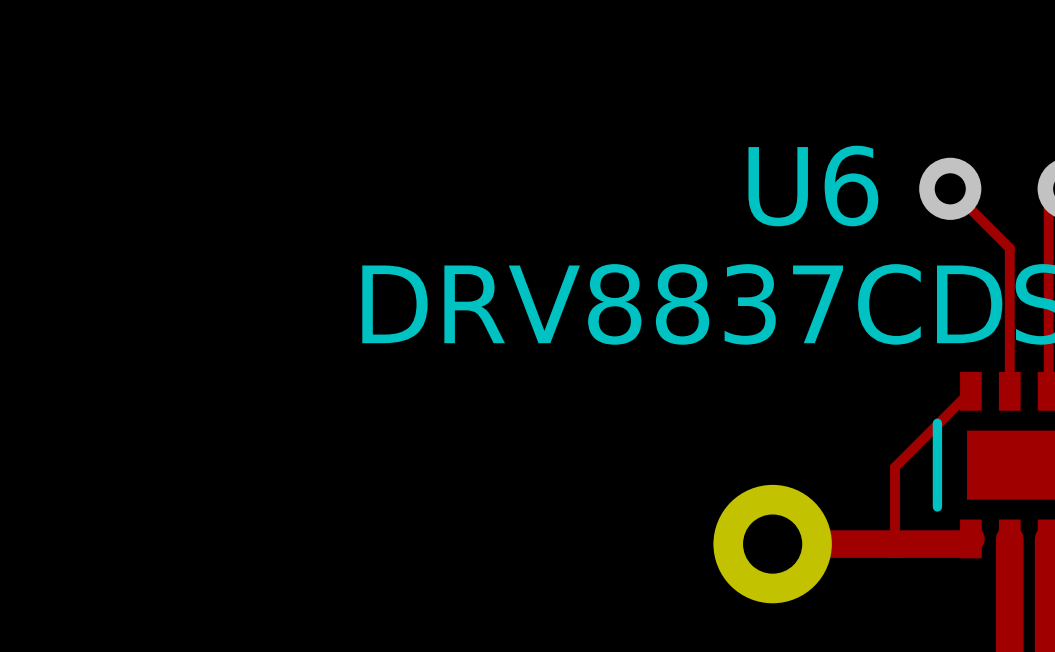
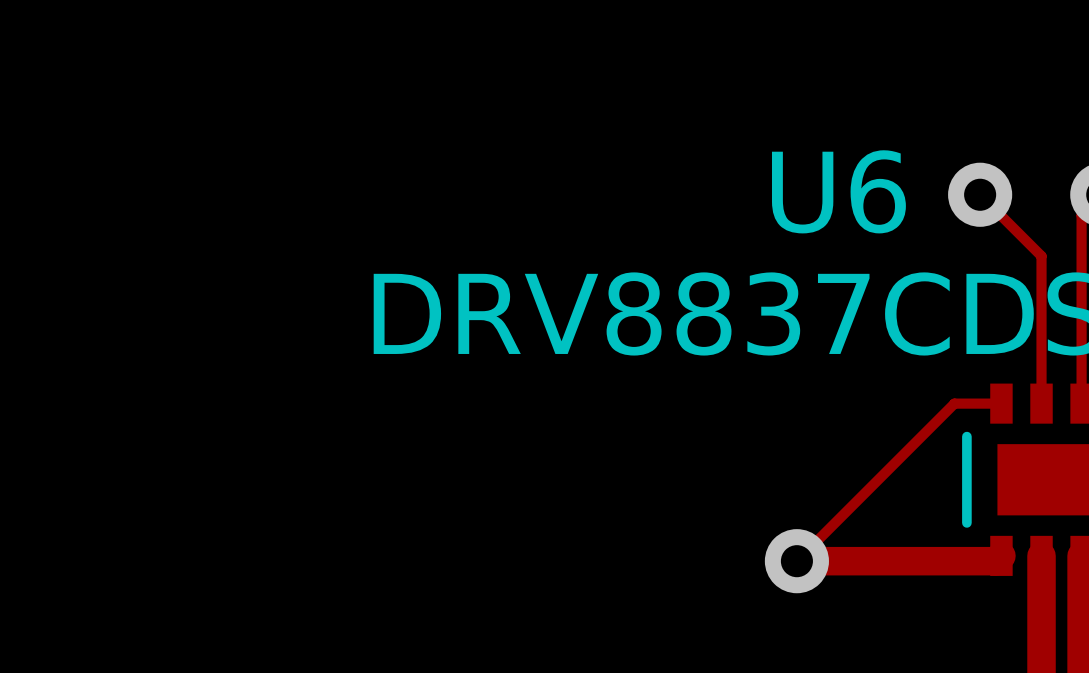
track: (970, 391) (894, 467) (894, 544) -> (1001, 403) (954, 403) (796, 561)
part: (772, 544) -> none
via: none -> (796, 561)

